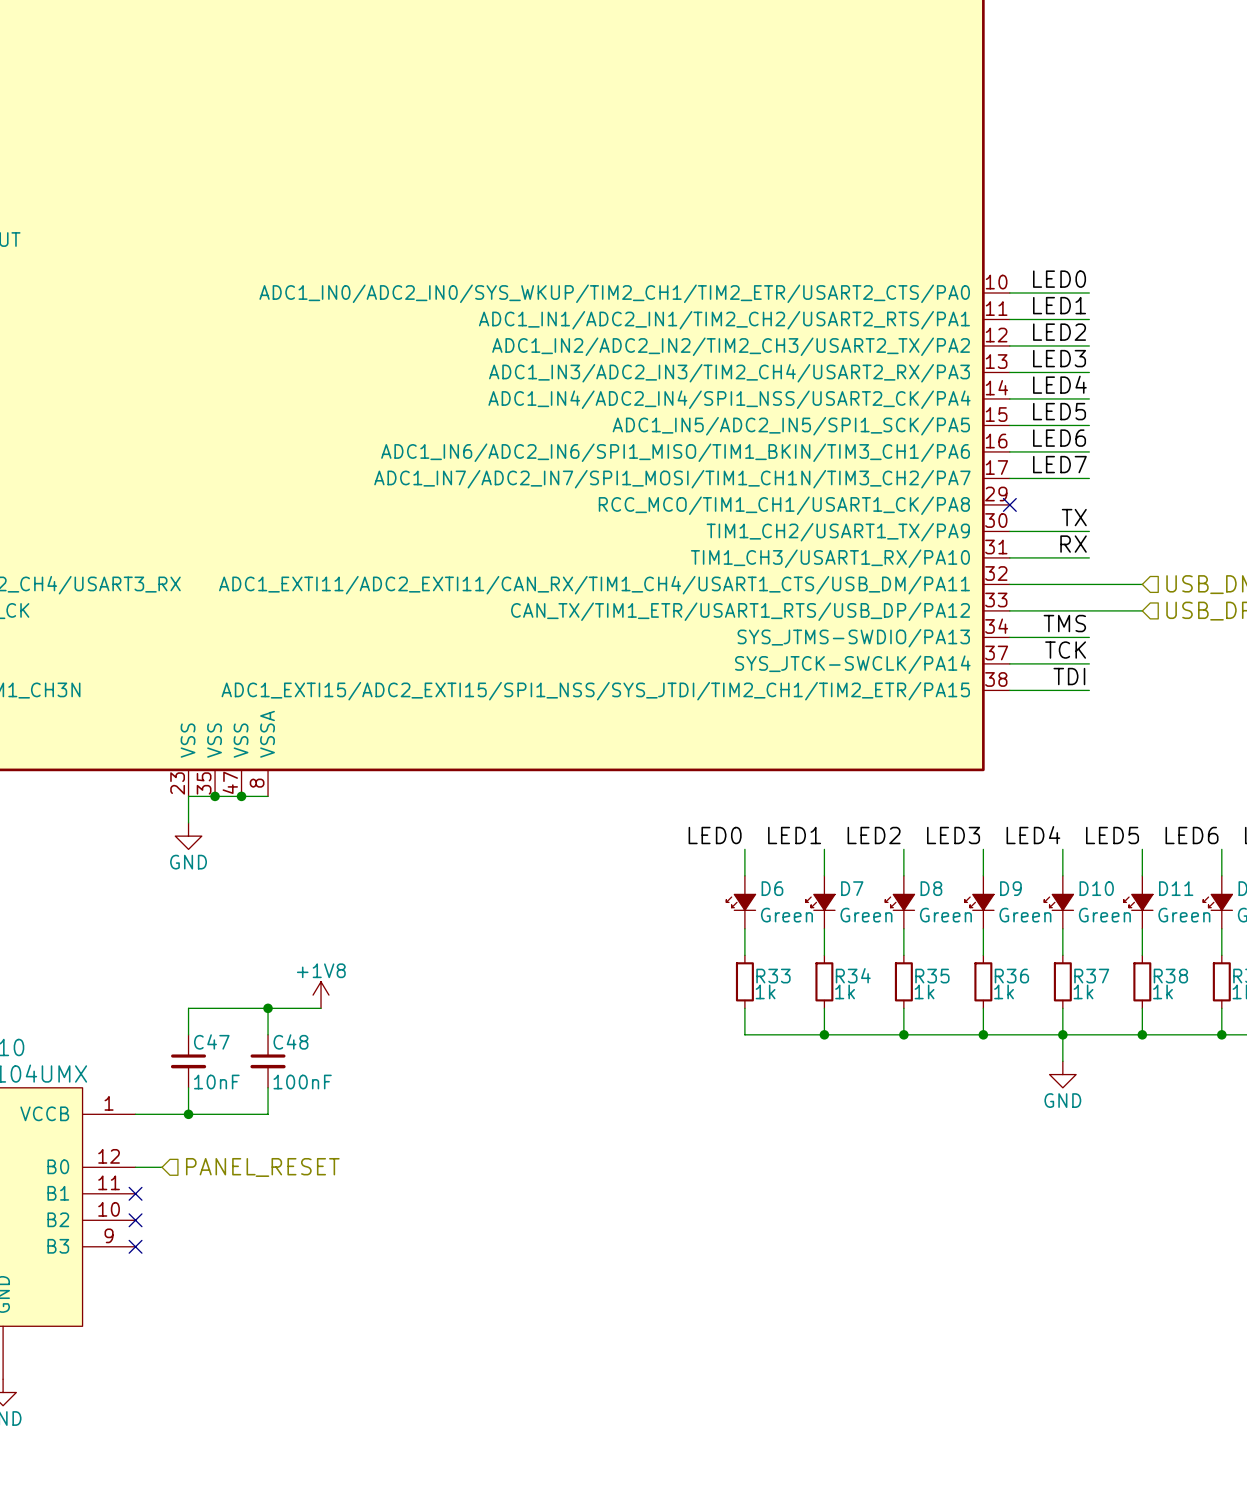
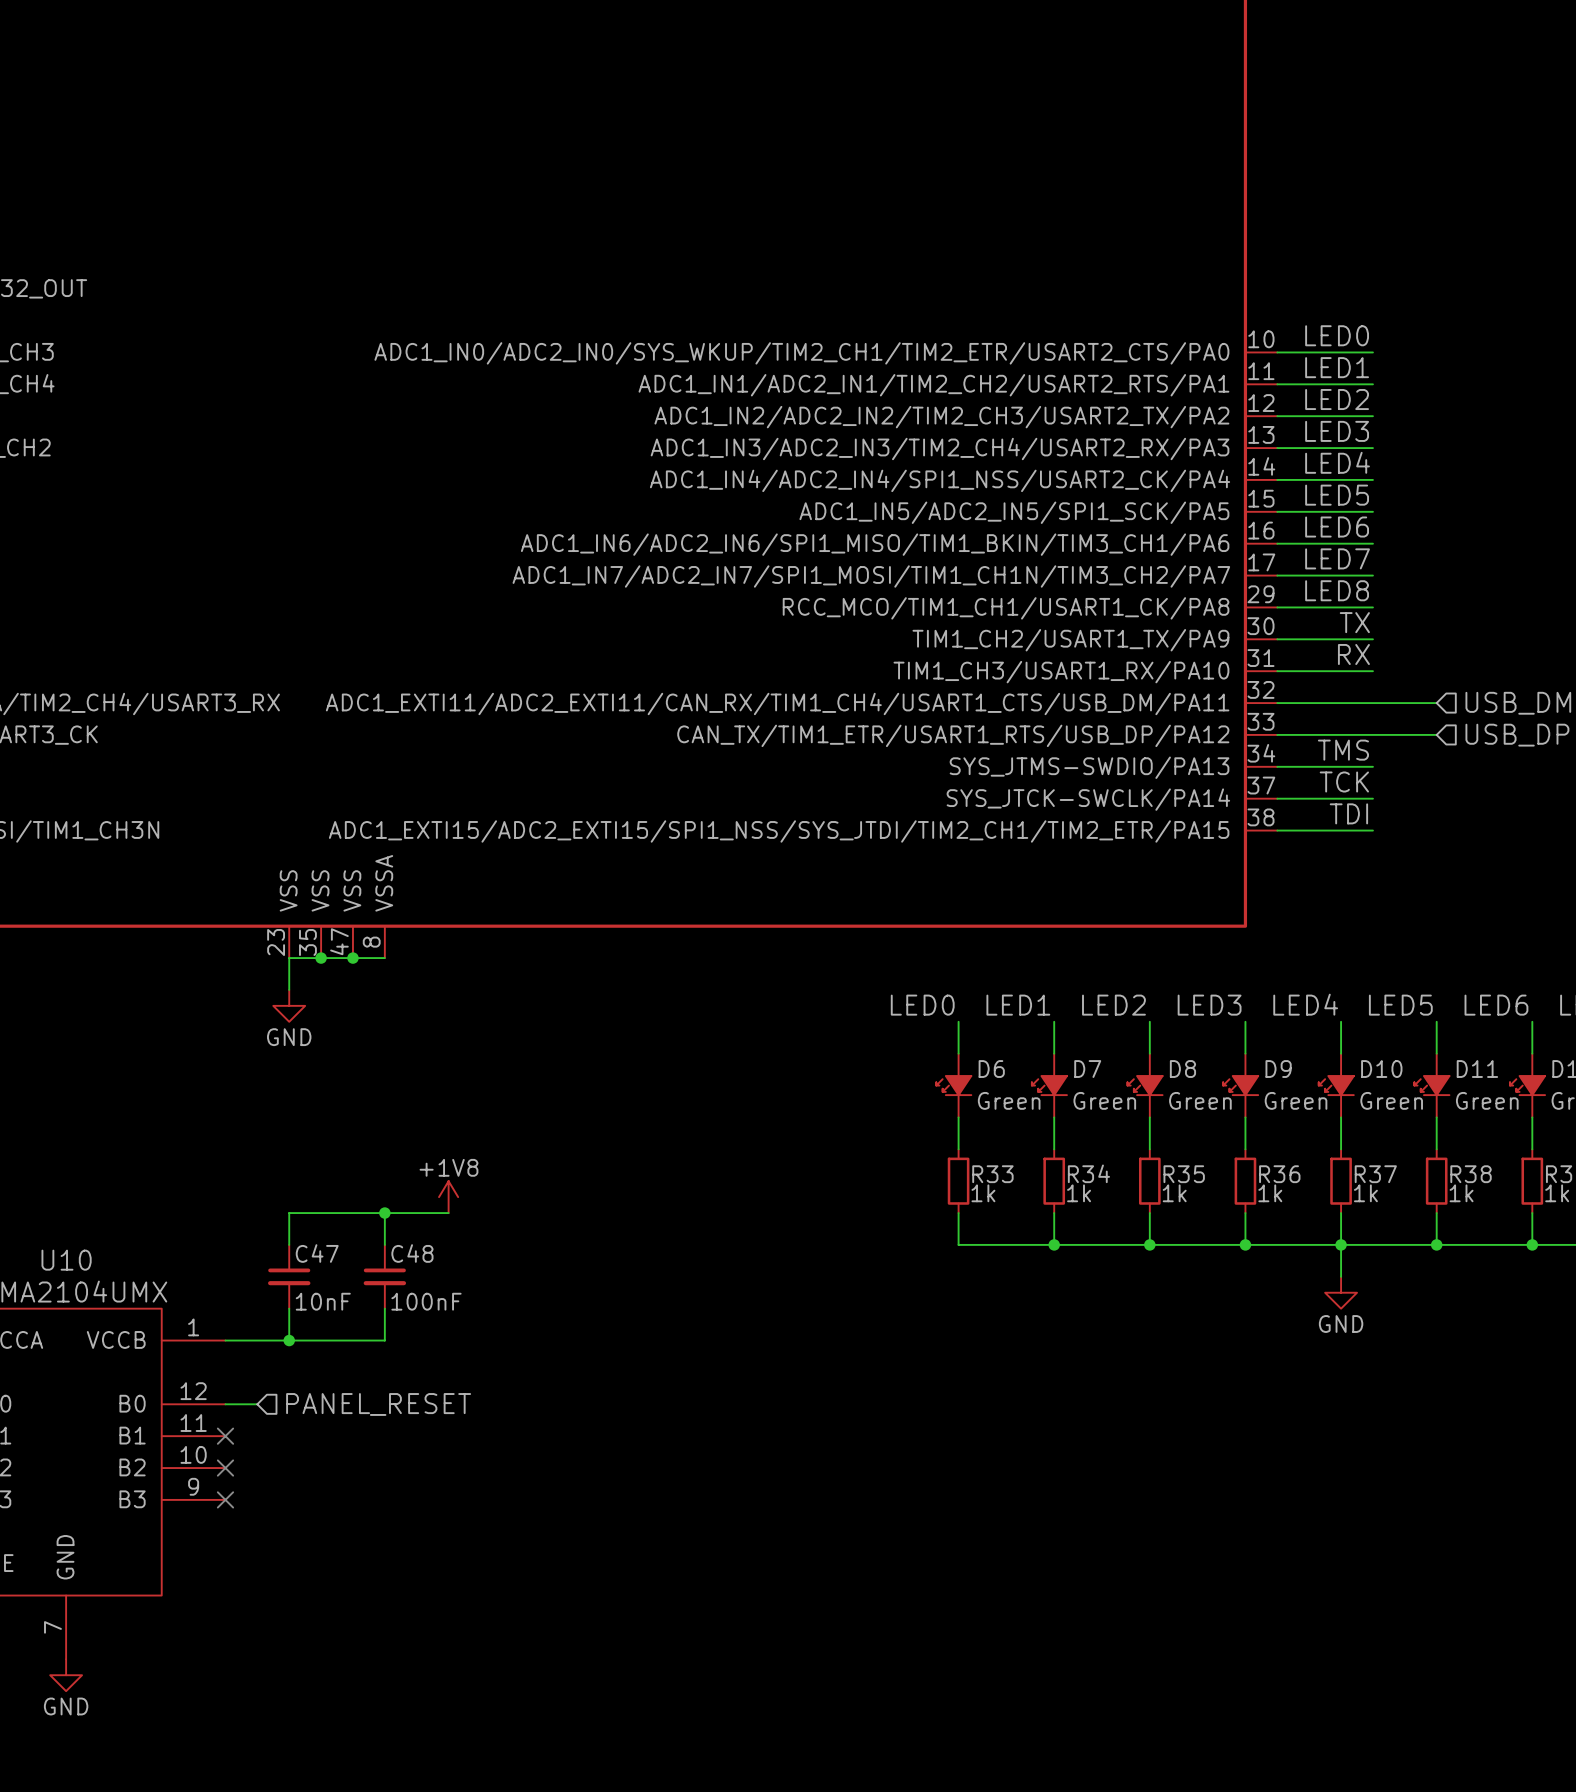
label: none -> LED8 (1337, 590)
wire: none -> (1277, 607) (1372, 607)
no-connect mark: (1009, 504) -> none

